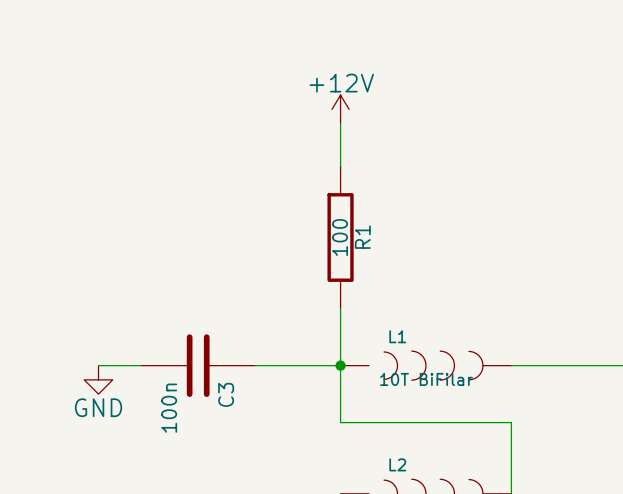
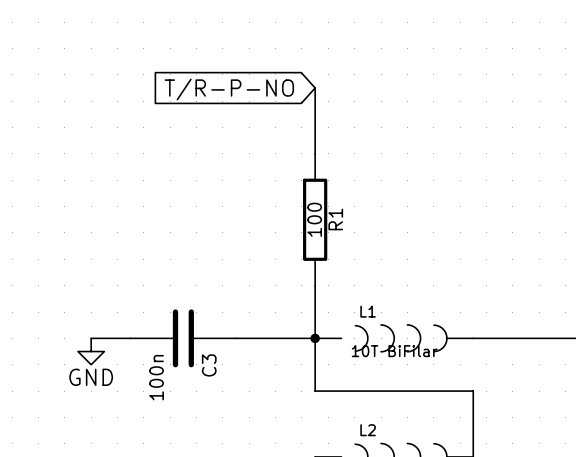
global label: none -> T/R-P-NO (229, 89)
power symbol: +12V (340, 109) -> none

